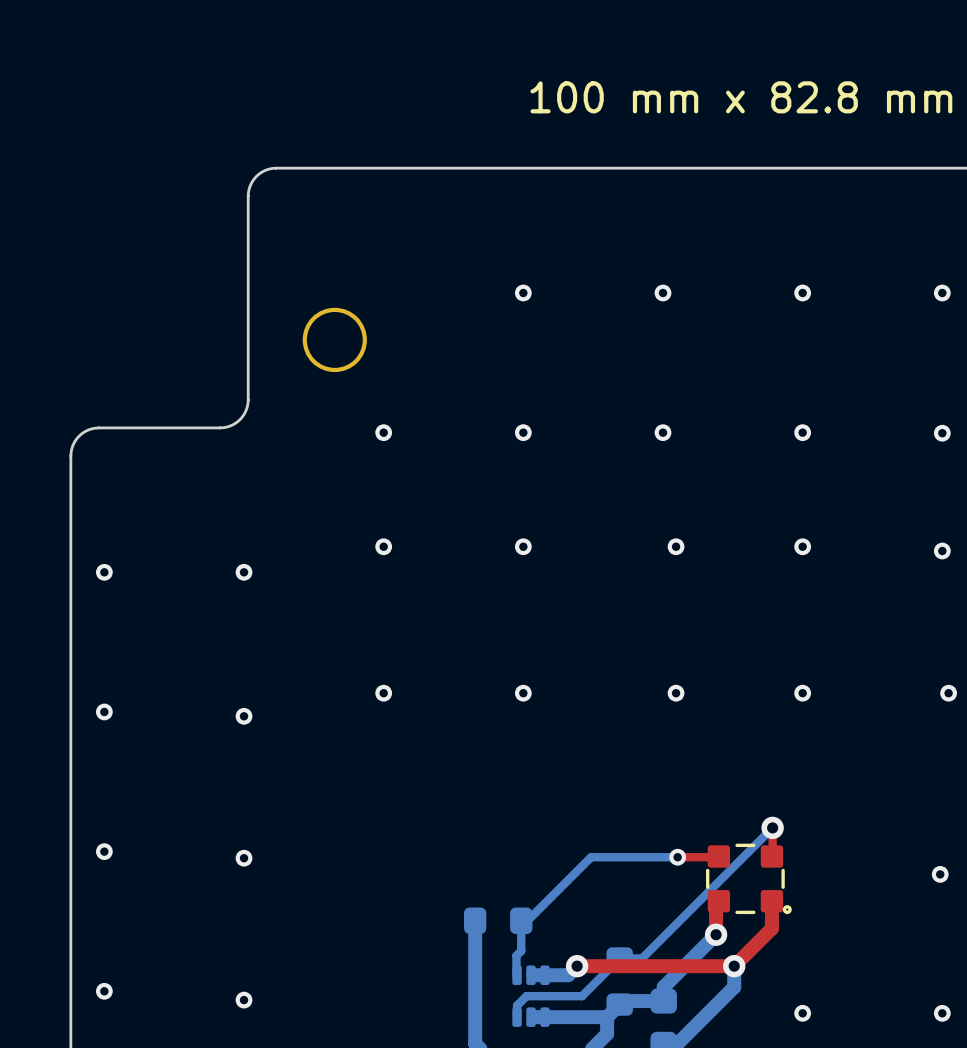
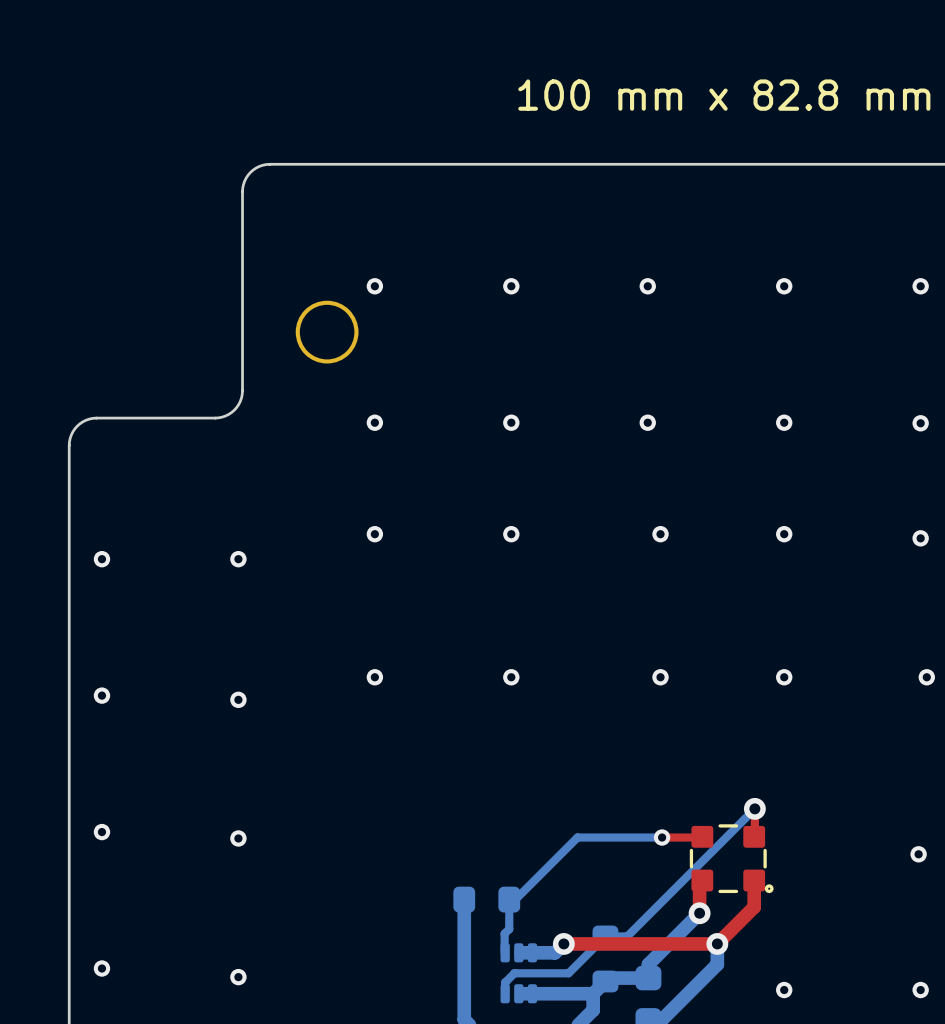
via: none -> (374, 286)

